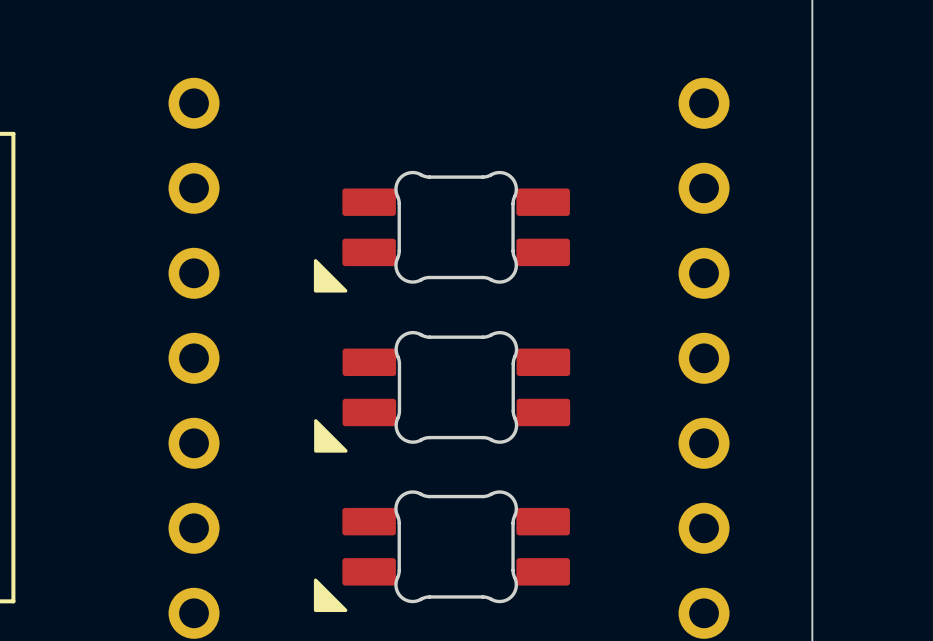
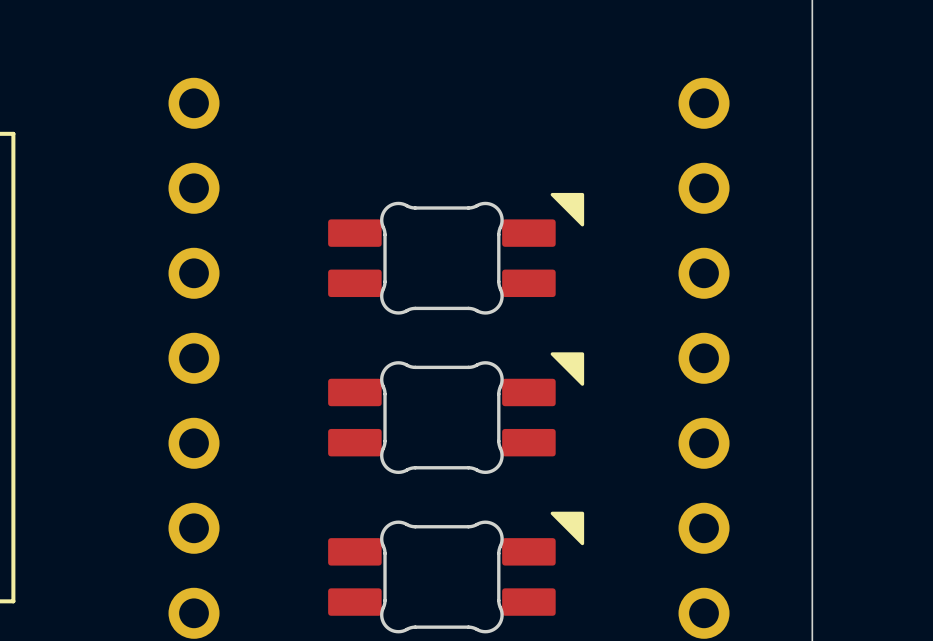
part rotation: 0° (441, 231) -> 180° (456, 253)
part rotation: 0° (442, 391) -> 180° (456, 413)
part rotation: 0° (441, 551) -> 180° (456, 572)

